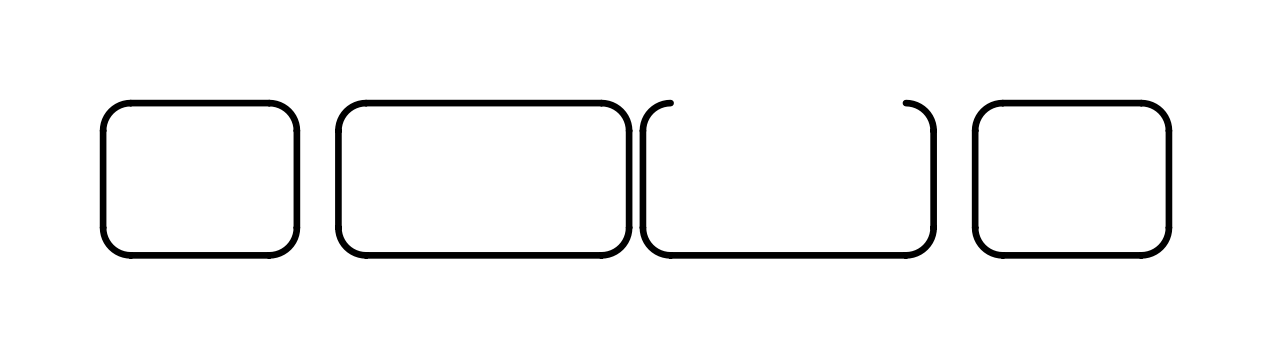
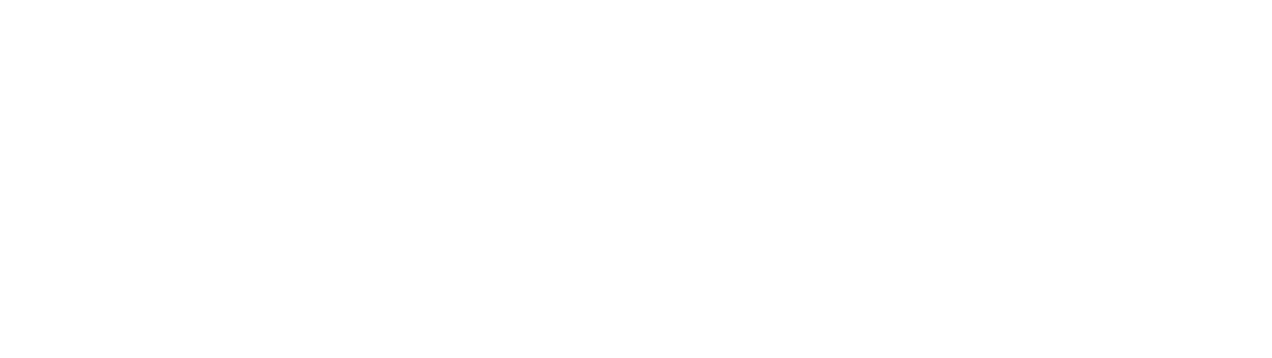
line: (130, 103) (269, 103) (279, 105) (288, 111) (294, 120) (296, 130) (296, 231) (288, 247) (279, 253) (269, 255) (130, 255) (120, 253) (111, 247) (105, 238) (103, 227) (103, 127) (111, 111) (120, 105) (130, 103) -> none
line: (366, 103) (601, 103) (615, 106) (625, 116) (628, 127) (629, 227) (625, 241) (615, 251) (601, 255) (366, 255) (352, 251) (342, 241) (338, 231) (338, 127) (346, 111) (355, 105) (366, 103) -> none
line: (670, 103) (660, 105) (651, 111) (645, 120) (642, 130) (643, 234) (653, 249) (670, 255) (905, 255) (919, 251) (929, 241) (933, 231) (933, 127) (925, 111) (916, 105) (905, 103) -> none
line: (1002, 103) (1141, 103) (1151, 105) (1160, 111) (1166, 120) (1168, 130) (1168, 231) (1160, 247) (1151, 253) (1141, 255) (1002, 255) (992, 253) (983, 247) (975, 231) (975, 127) (983, 111) (992, 105) (1002, 103) -> none

